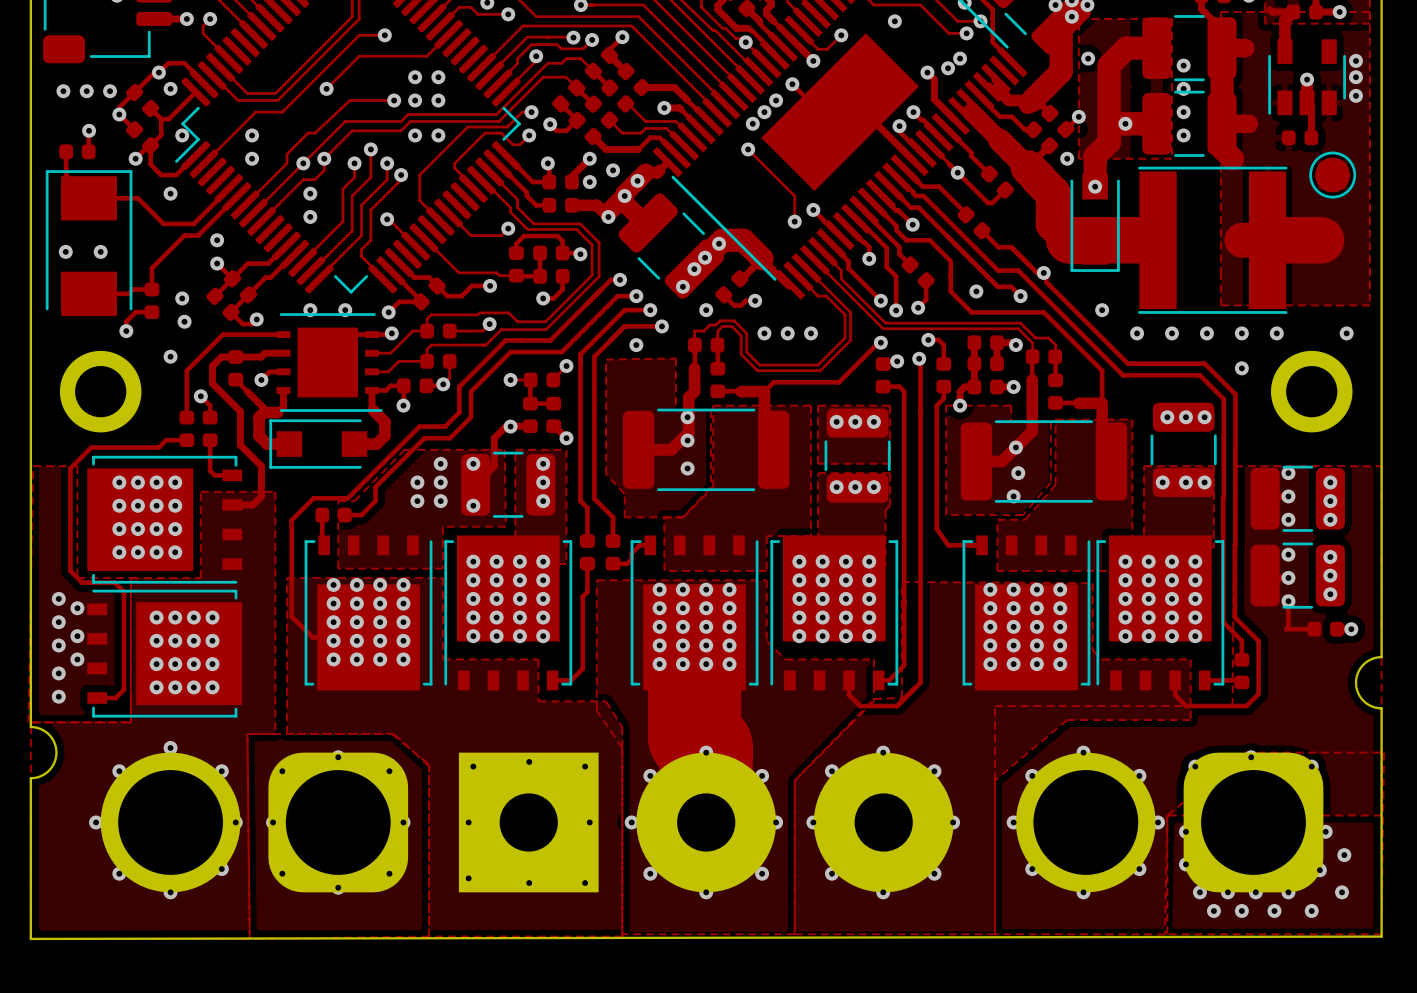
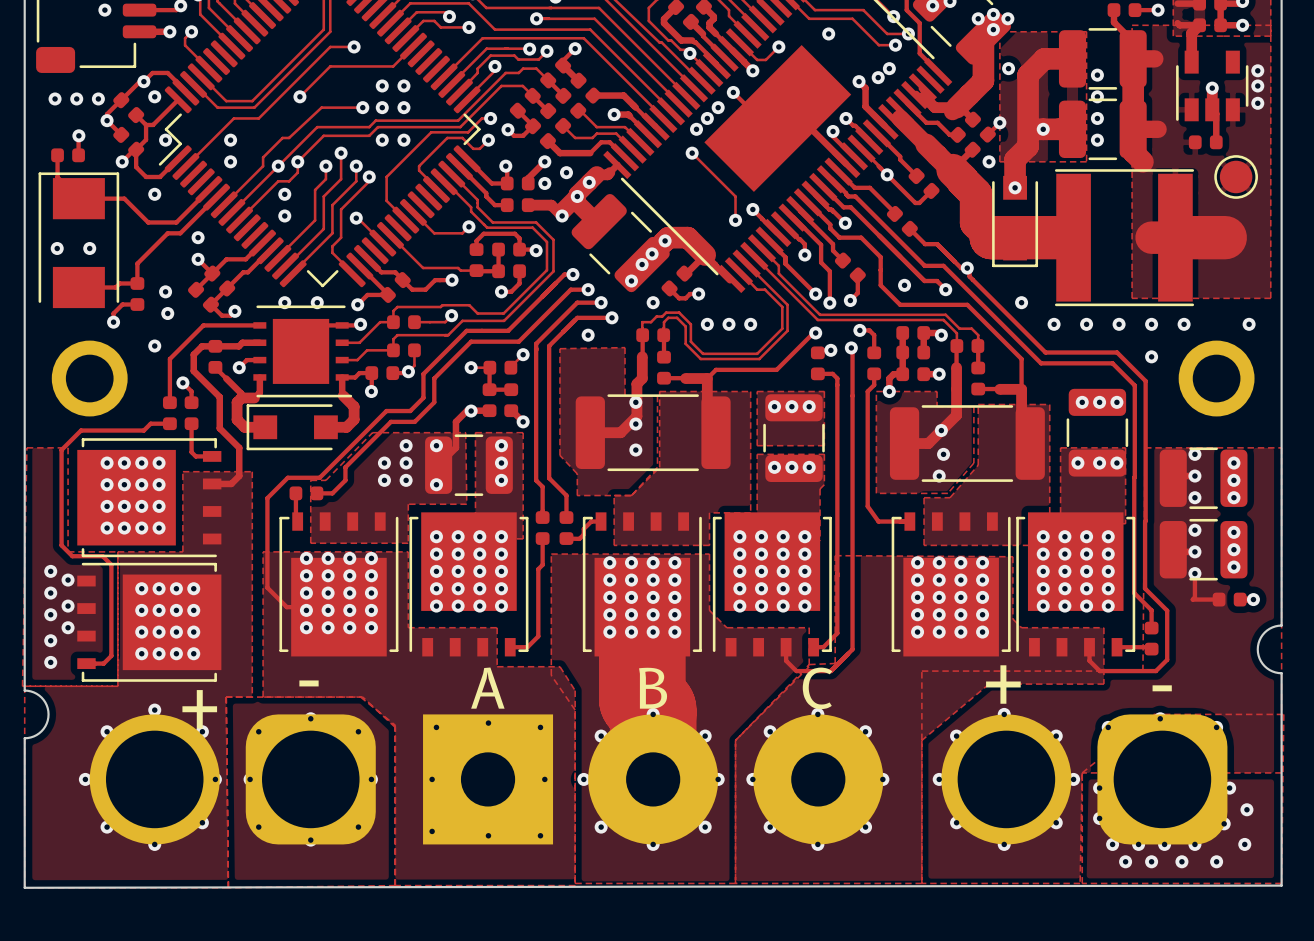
text: none -> - (309, 683)
text: none -> + (1003, 684)
text: none -> - (1162, 688)
text: none -> A (487, 688)
text: none -> B (653, 688)
text: none -> C (817, 688)
text: none -> + (199, 709)

